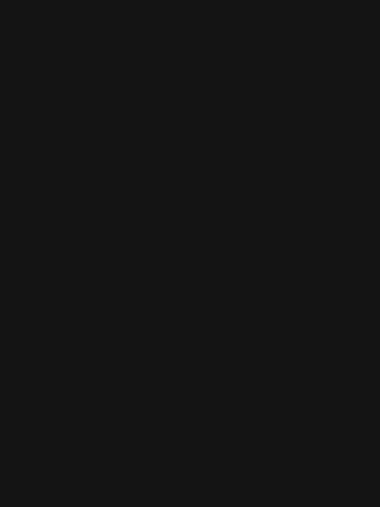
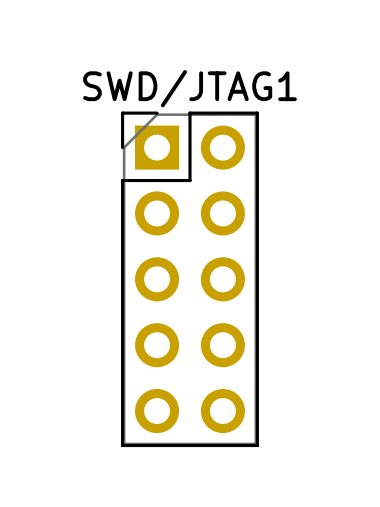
SWD/JTAG1: none -> (189, 279)

